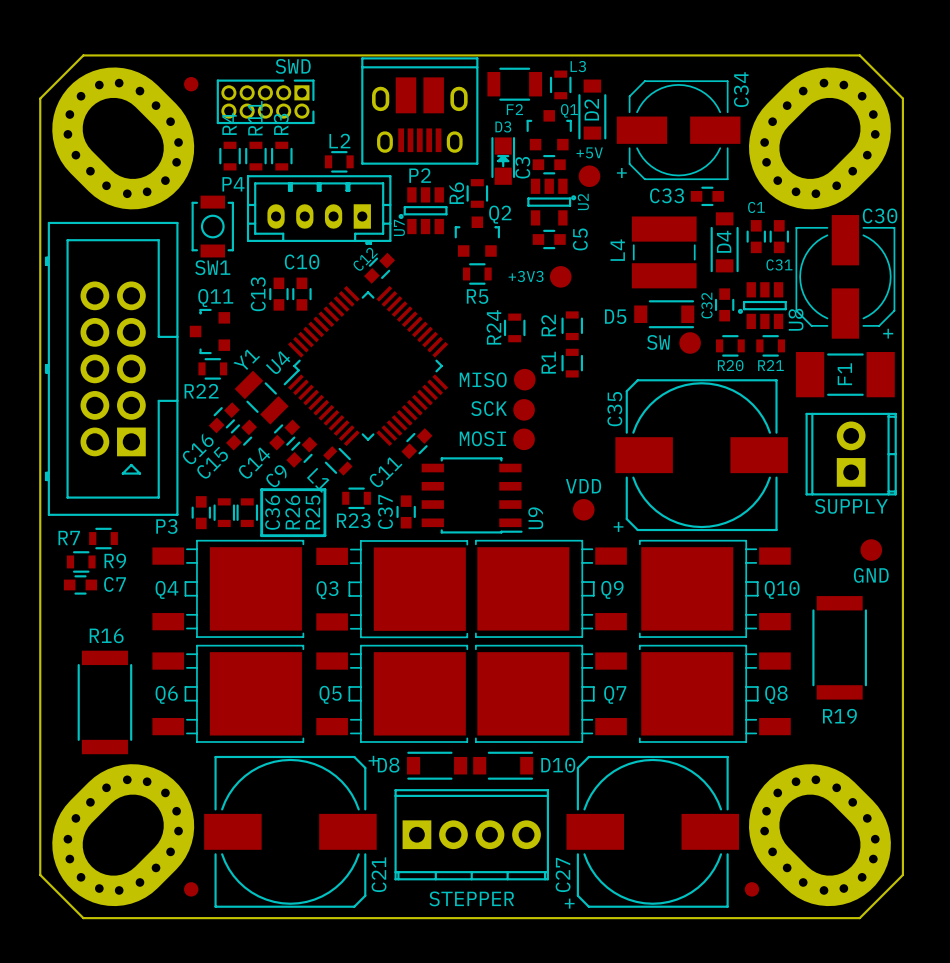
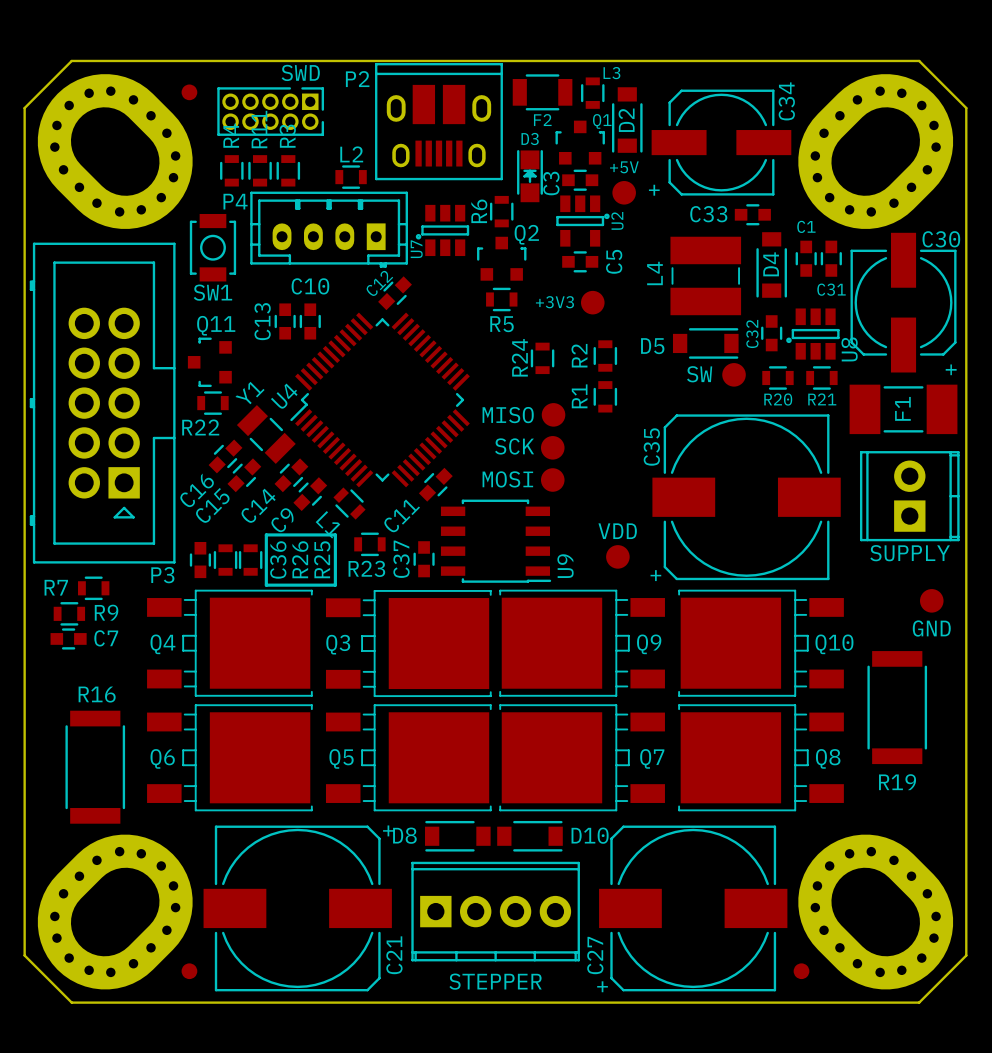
C34 footprint: [616, 80, 741, 181] -> [651, 89, 792, 196]
P2 name position: P2 (420, 175) -> P2 (357, 79)
C30 footprint: [795, 215, 896, 339] -> [850, 232, 957, 373]

